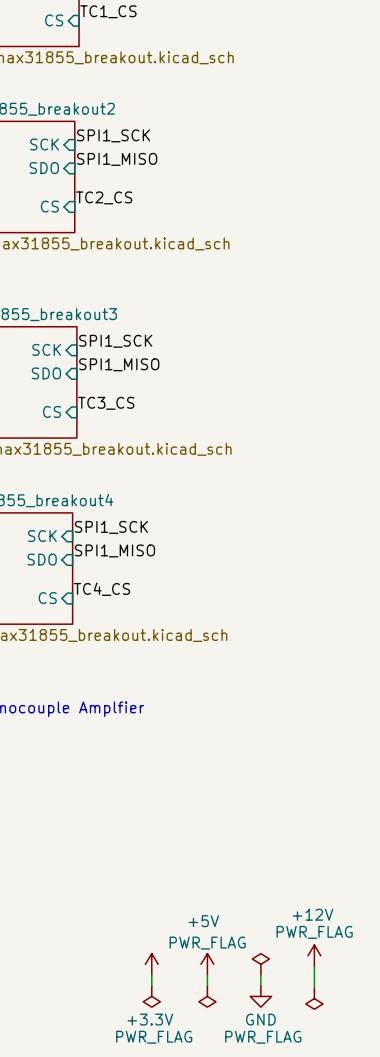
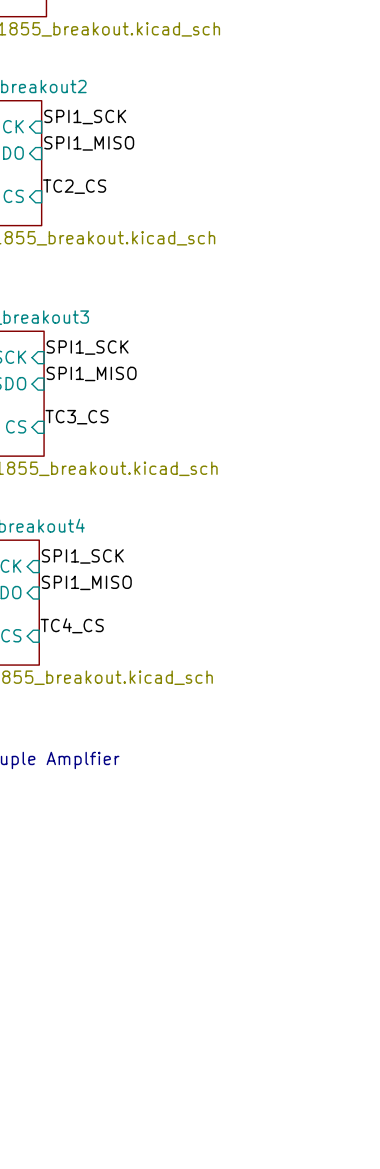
power symbol: +12V (314, 955) -> none
power symbol: +3.3V (151, 964) -> none
power symbol: +5V (207, 964) -> none
power symbol: PWR_FLAG (260, 964) -> none
wire: (314, 966) (314, 987) -> none
wire: (151, 975) (151, 985) -> none
wire: (207, 975) (207, 985) -> none
wire: (260, 975) (260, 985) -> none
power symbol: PWR_FLAG (151, 996) -> none
power symbol: PWR_FLAG (207, 996) -> none
power symbol: GND (260, 996) -> none
power symbol: PWR_FLAG (314, 998) -> none

